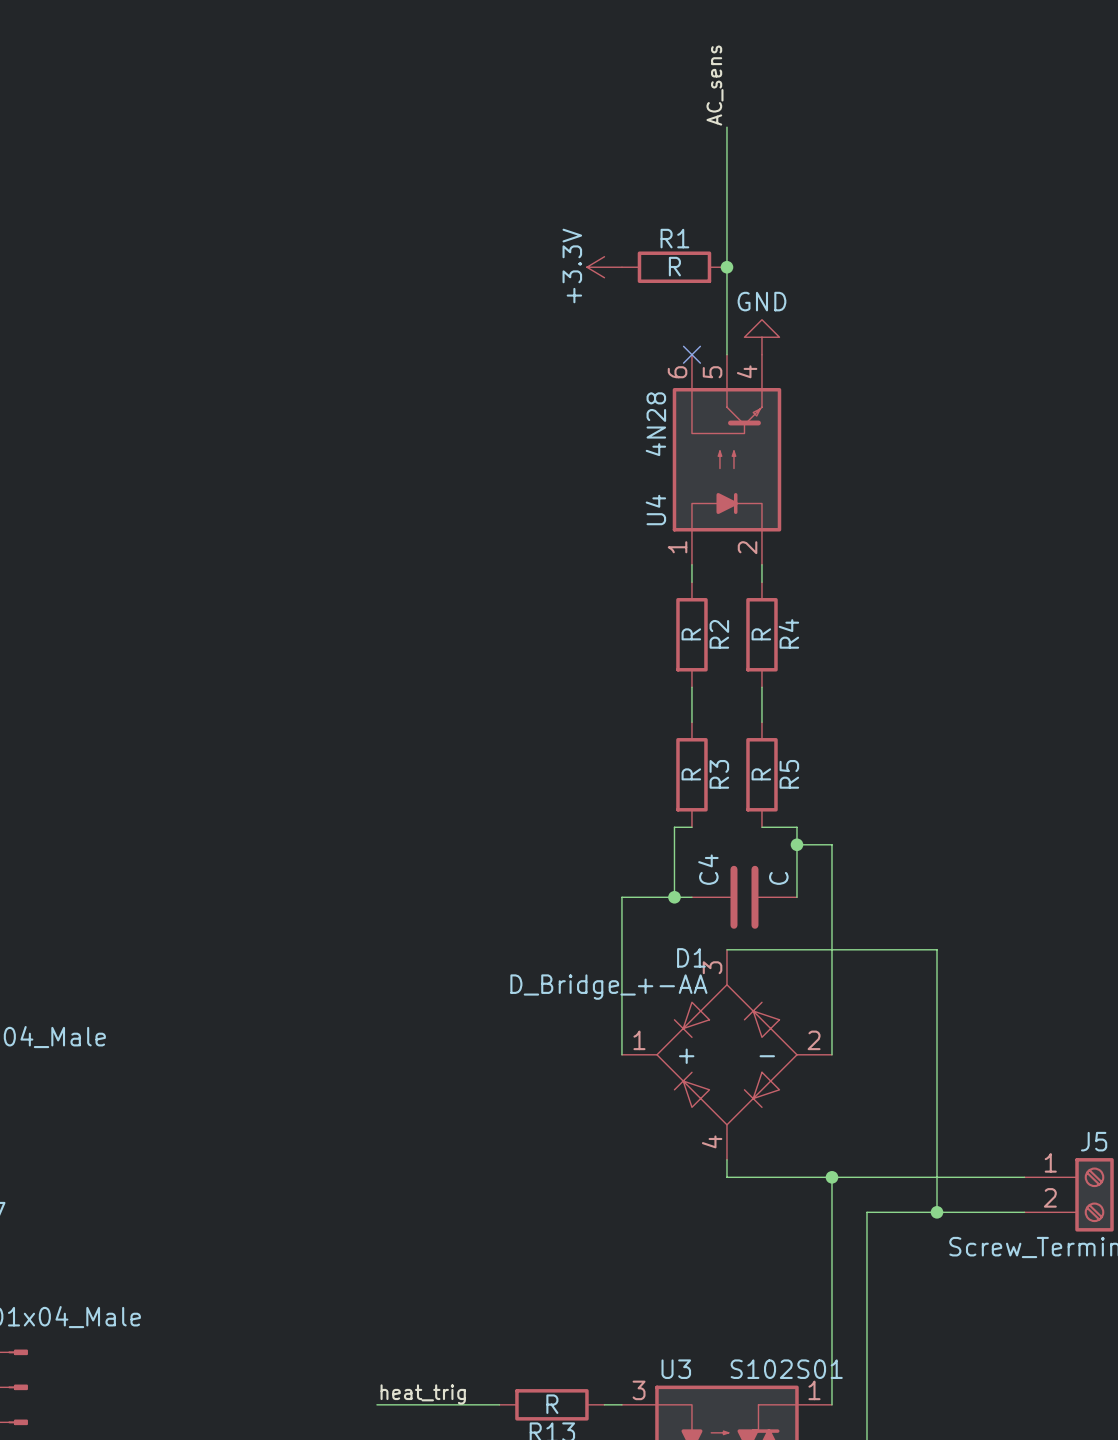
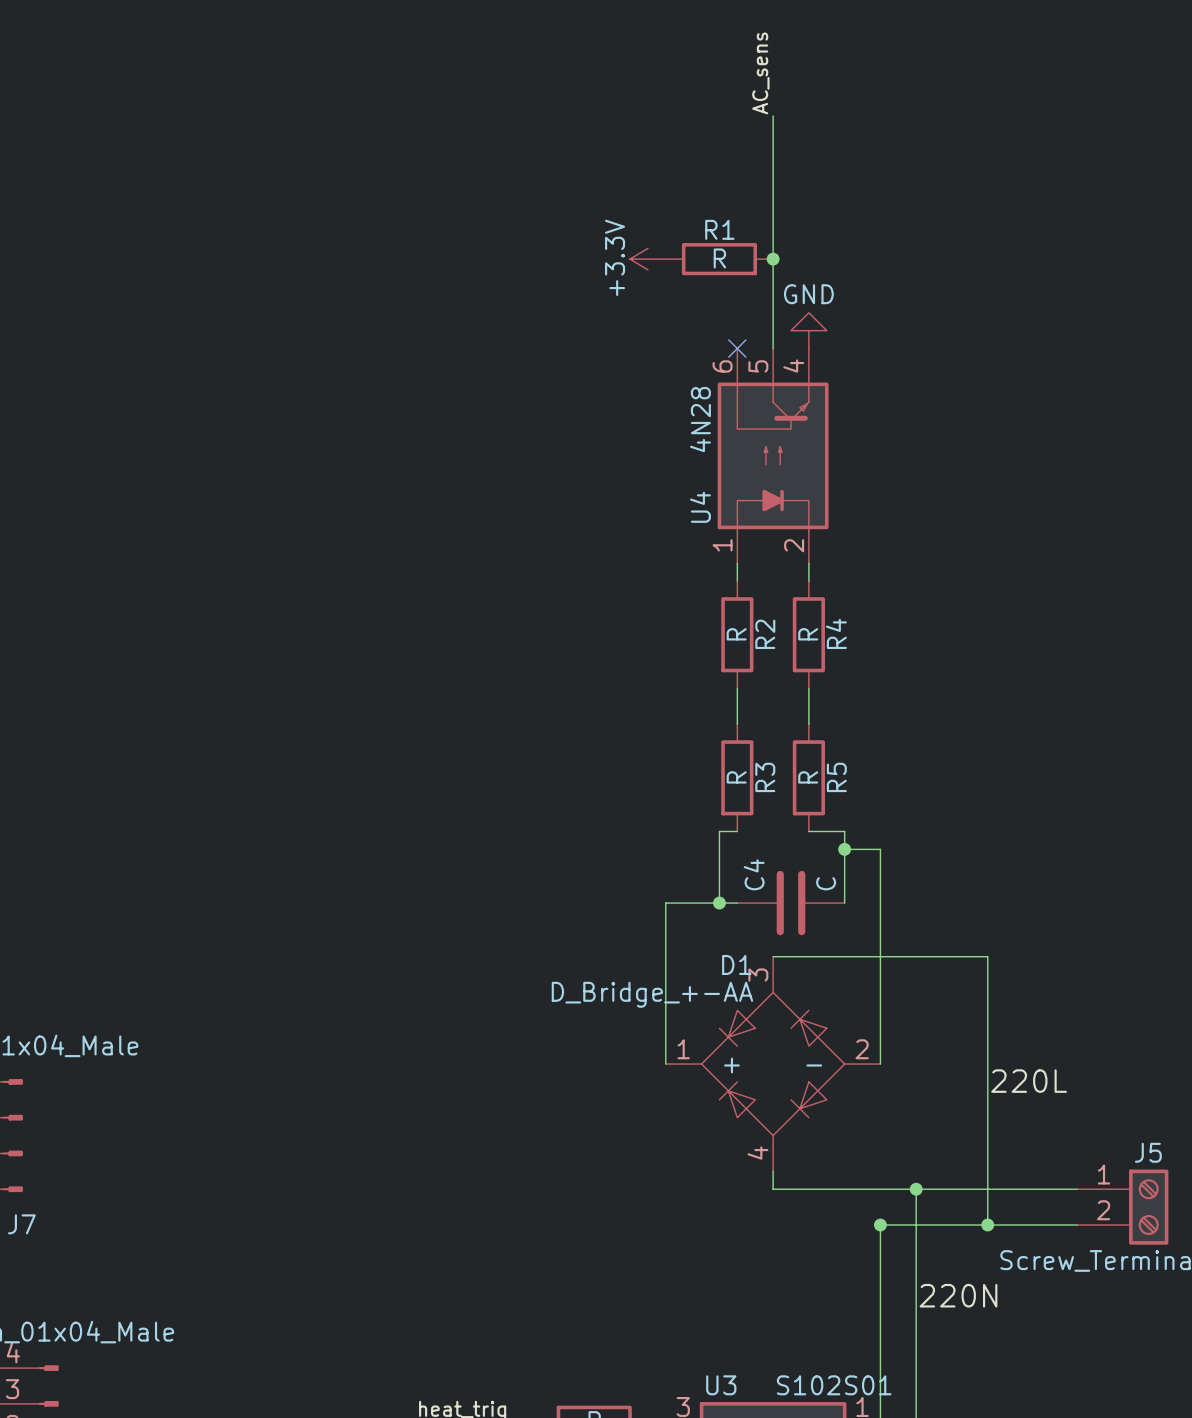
label: none -> 220L (1029, 1081)
wire: (831, 1177) (831, 1212) -> (916, 1189) (916, 1225) (880, 1225)
junction: (831, 1177) -> none
junction: none -> (916, 1189)
junction: none -> (880, 1225)
label: none -> 220N (958, 1295)

